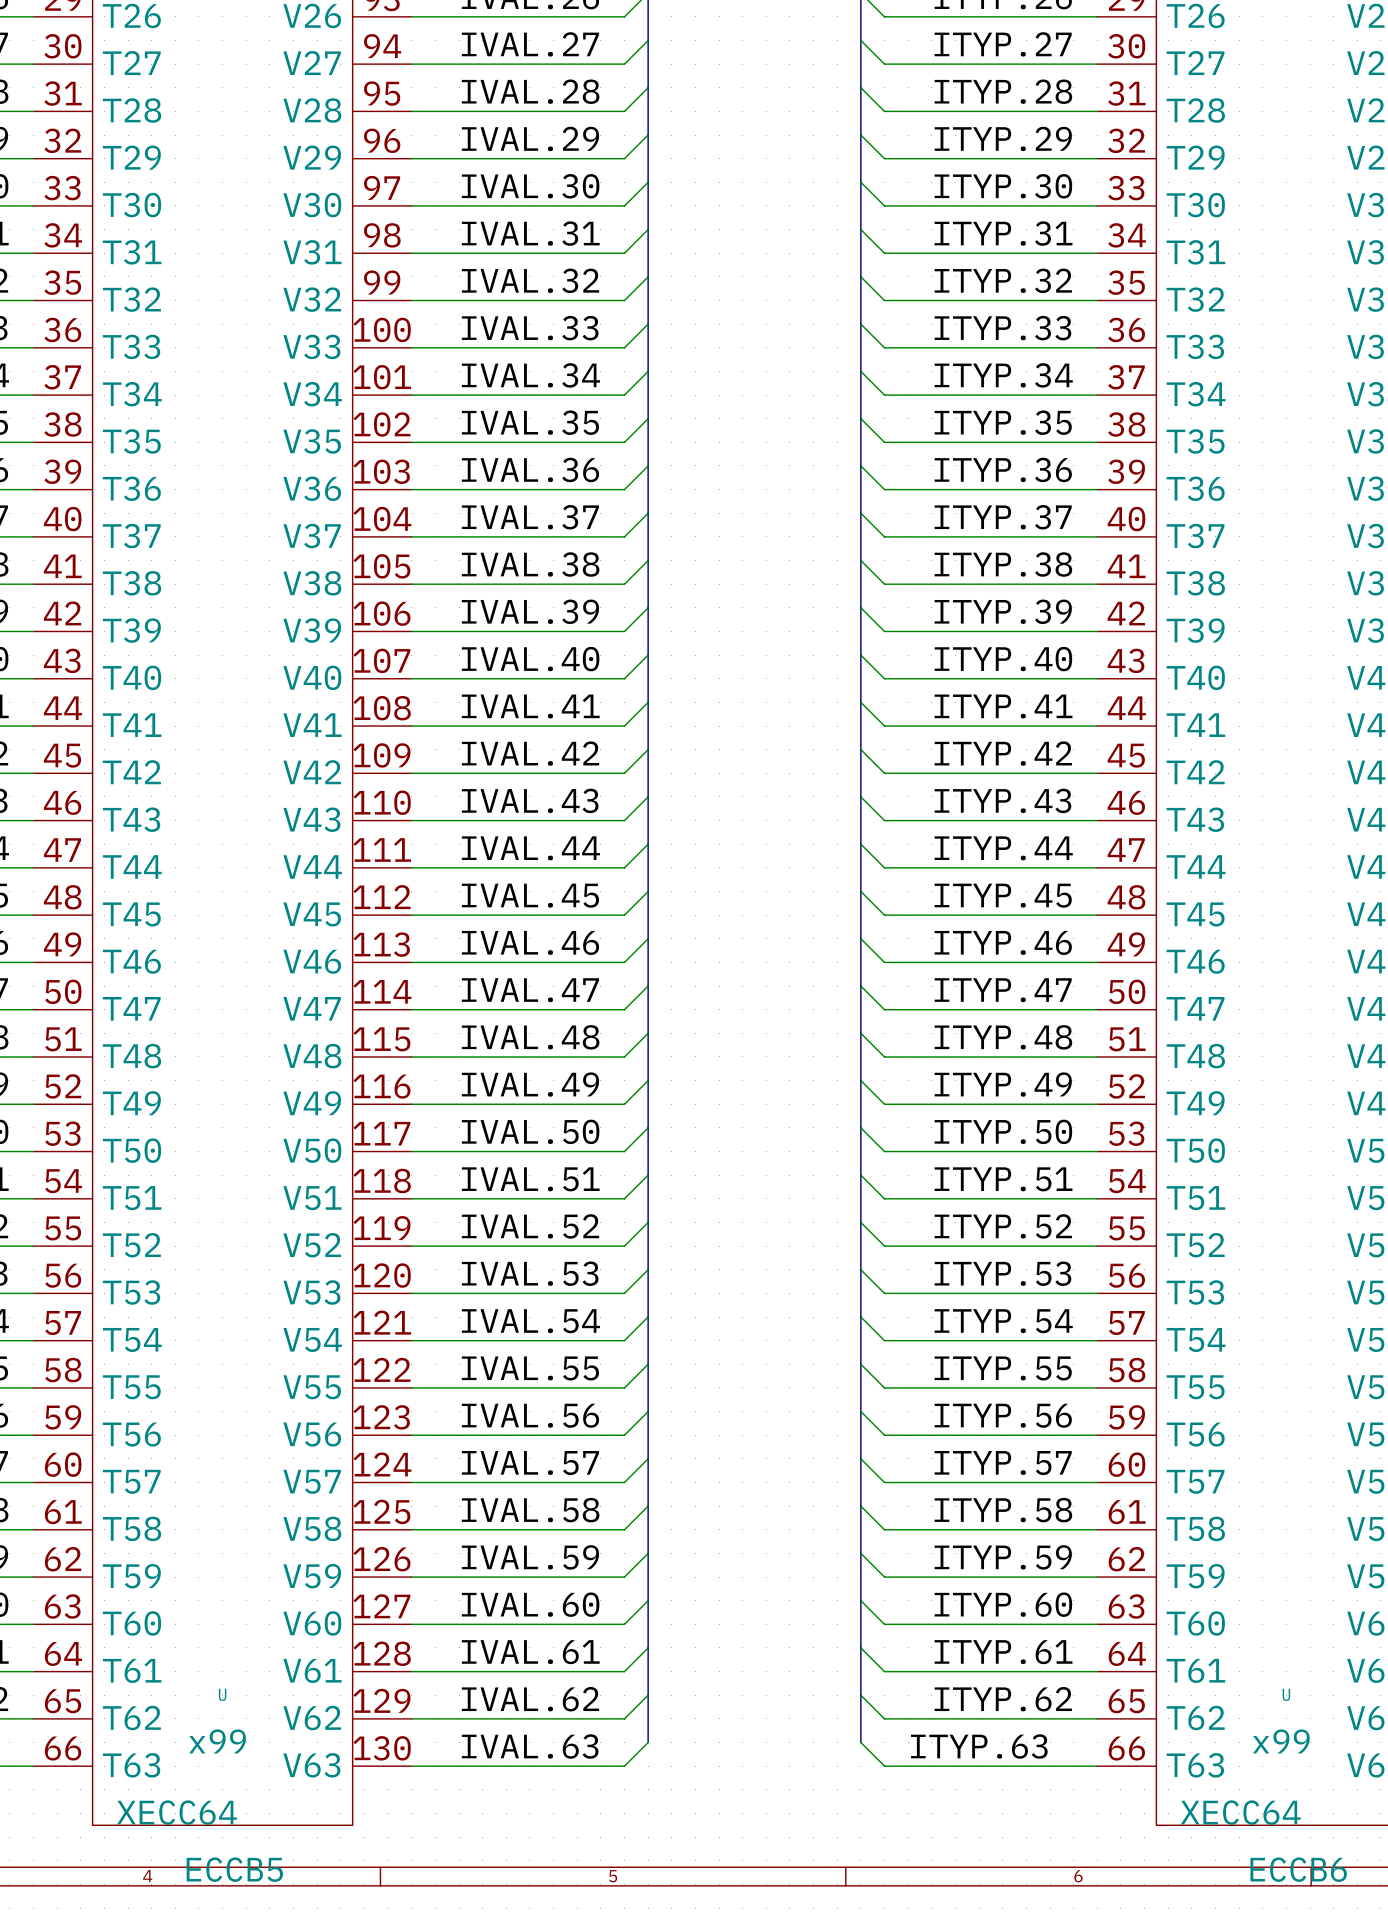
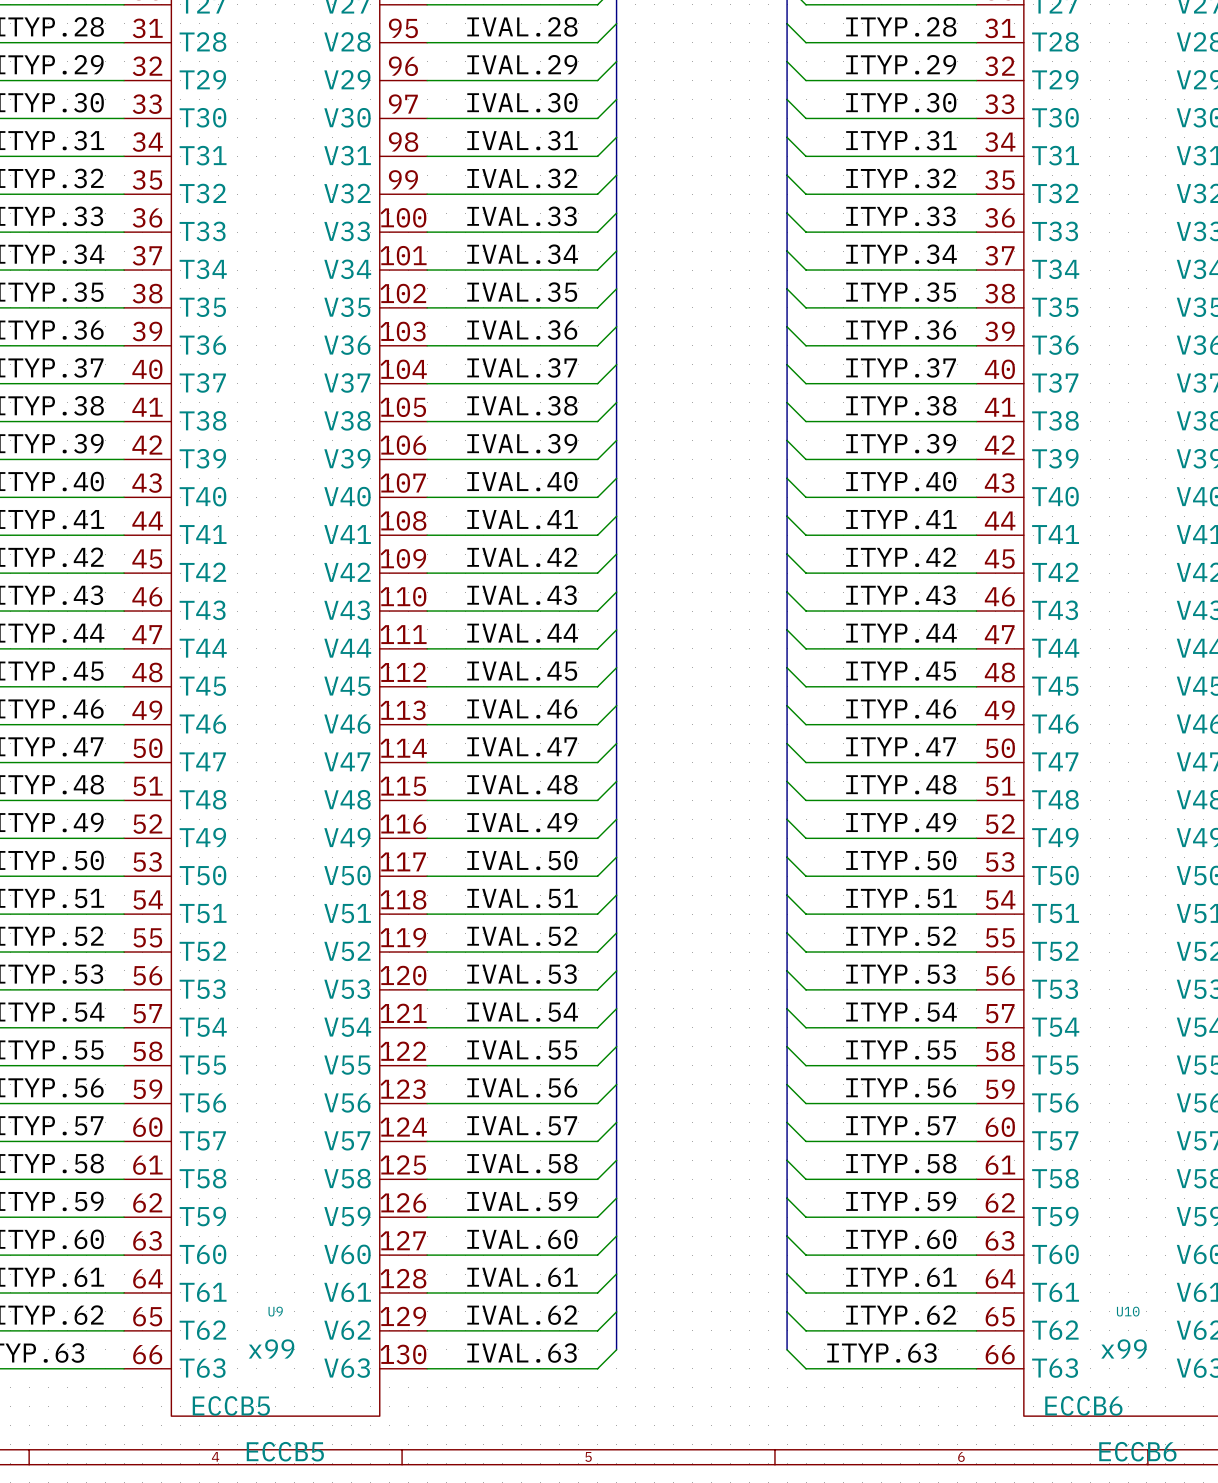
U name: U (222, 1694) -> U9 (275, 1311)
U name: U (1286, 1694) -> U10 (1128, 1311)
U value: XECC64 (176, 1812) -> ECCB5 (231, 1405)
U value: XECC64 (1240, 1812) -> ECCB6 (1083, 1405)

